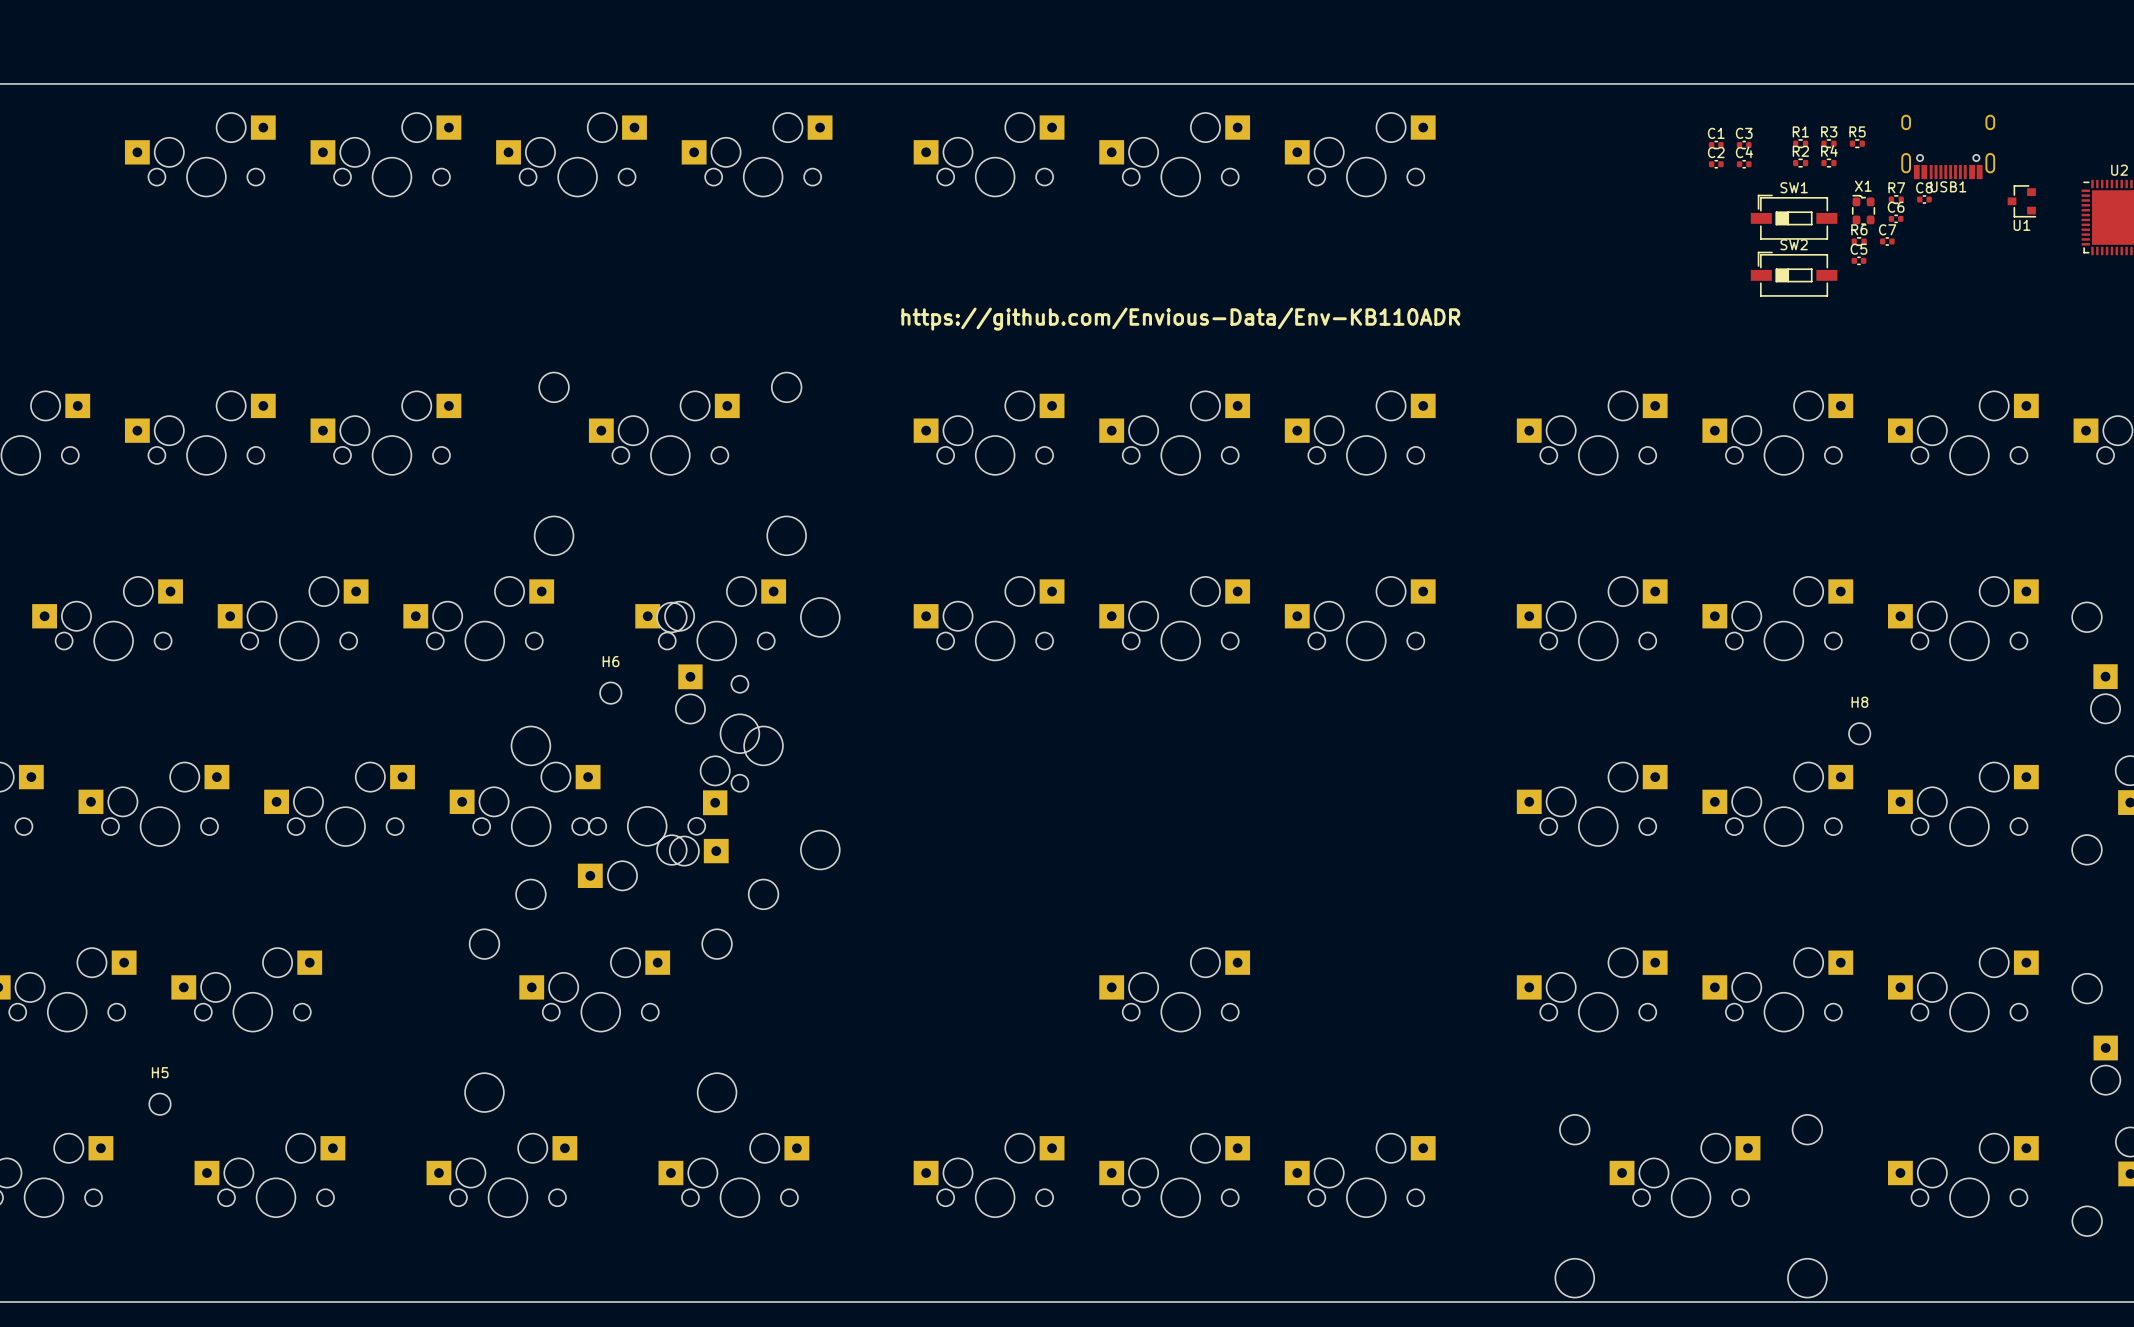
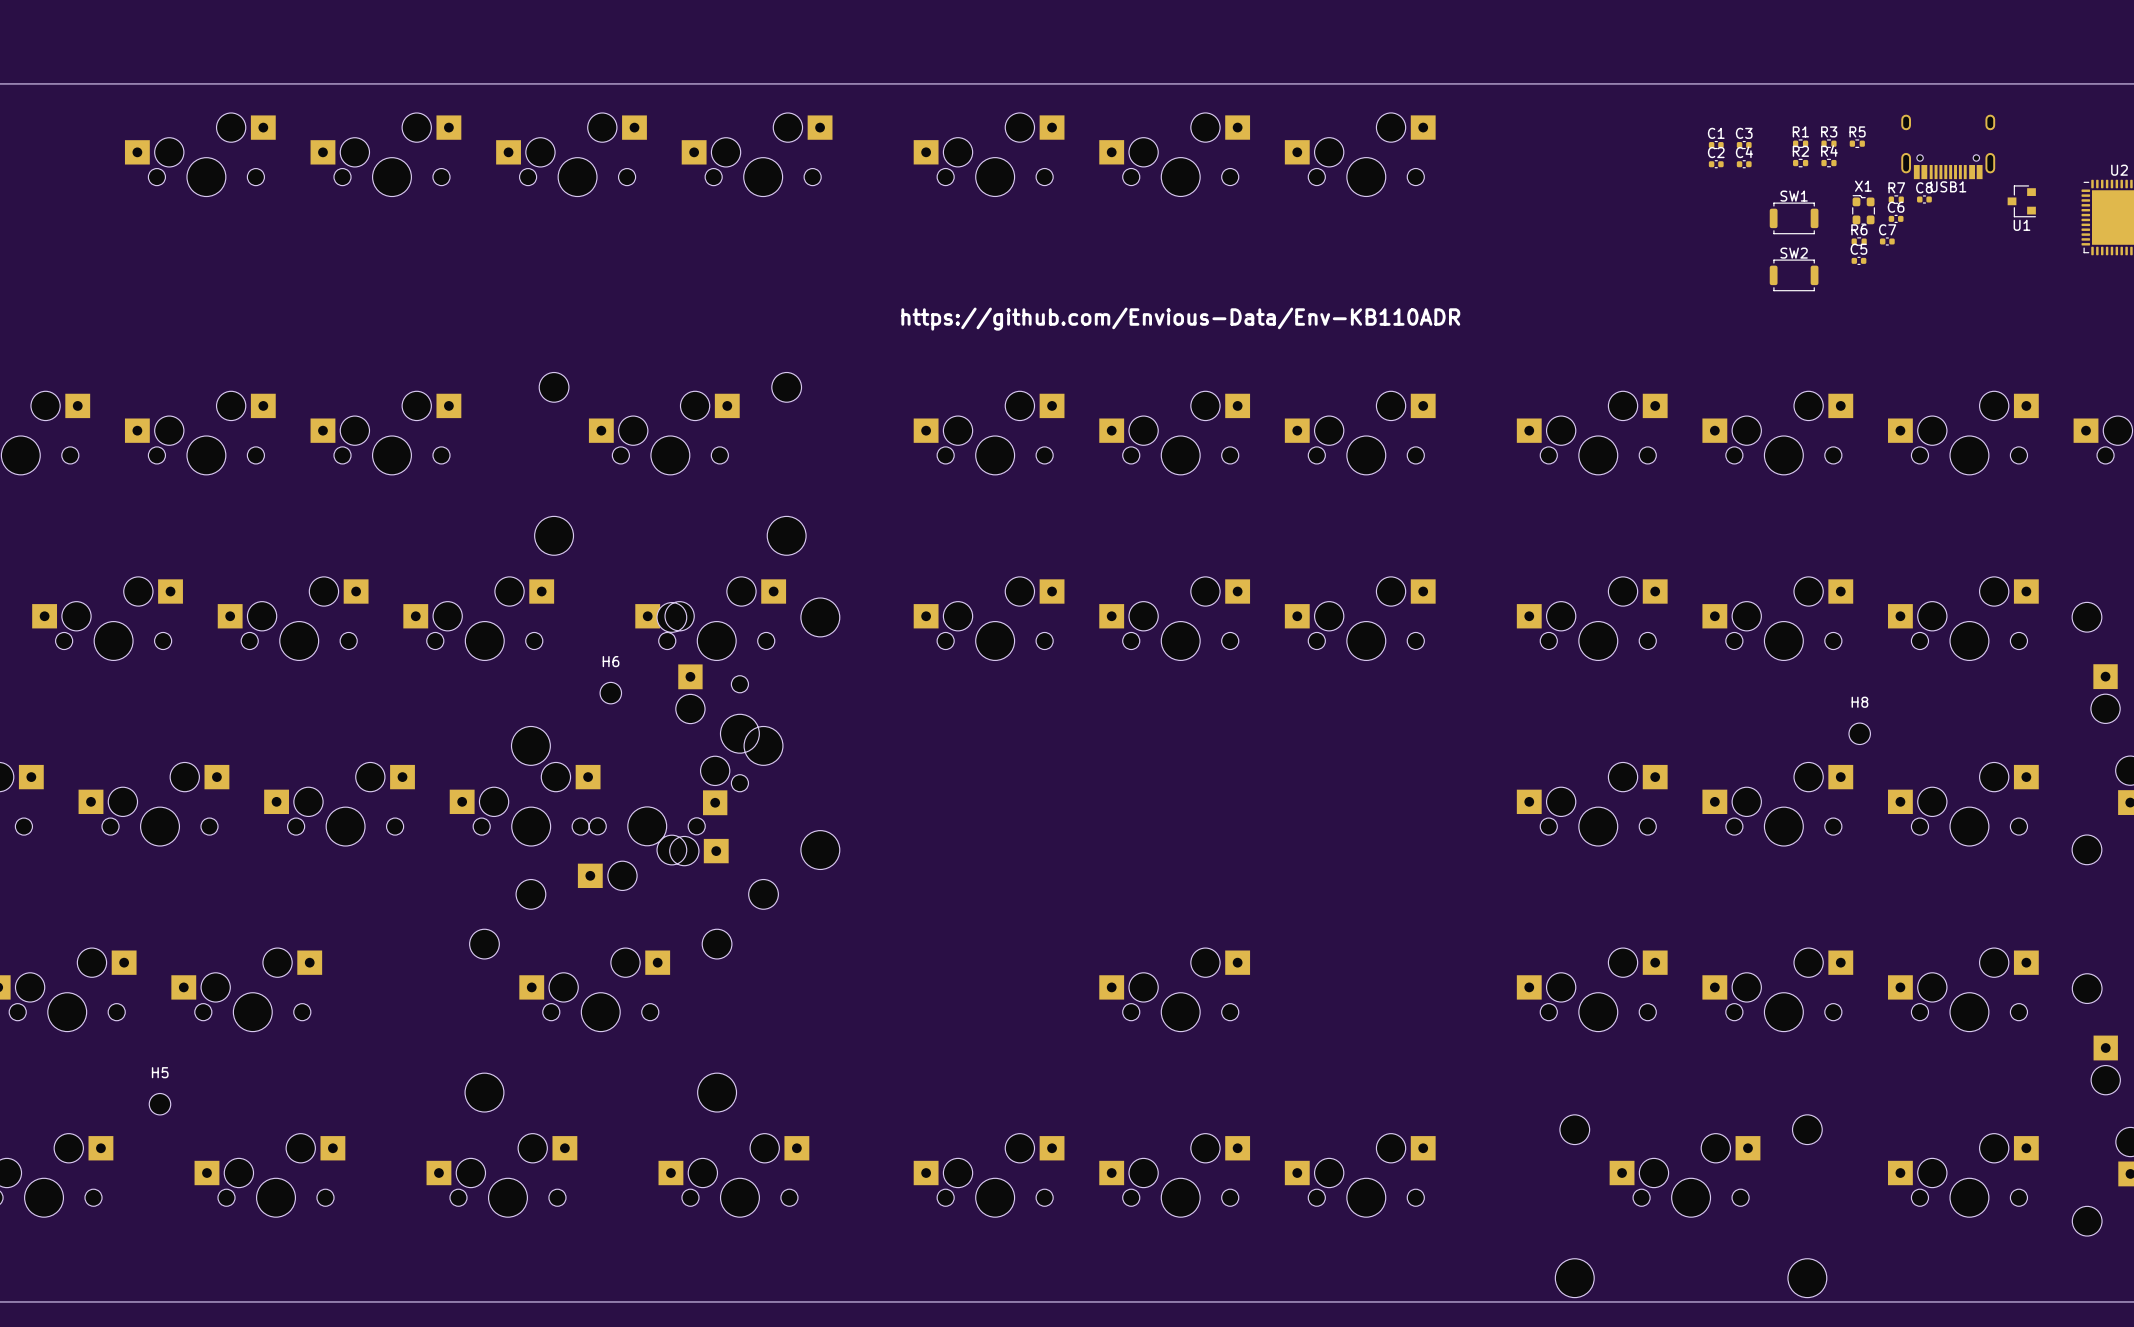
SW1 footprint: [1750, 194, 1838, 240] -> [1769, 202, 1819, 235]
SW2 footprint: [1750, 251, 1838, 297] -> [1769, 259, 1819, 292]

